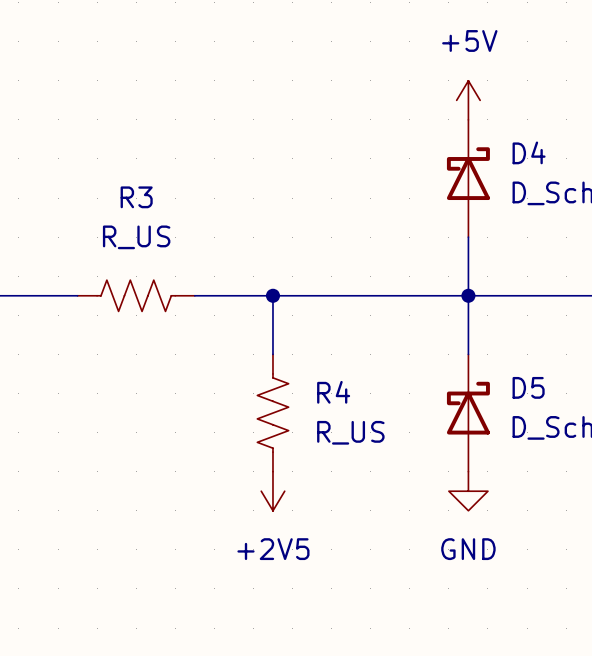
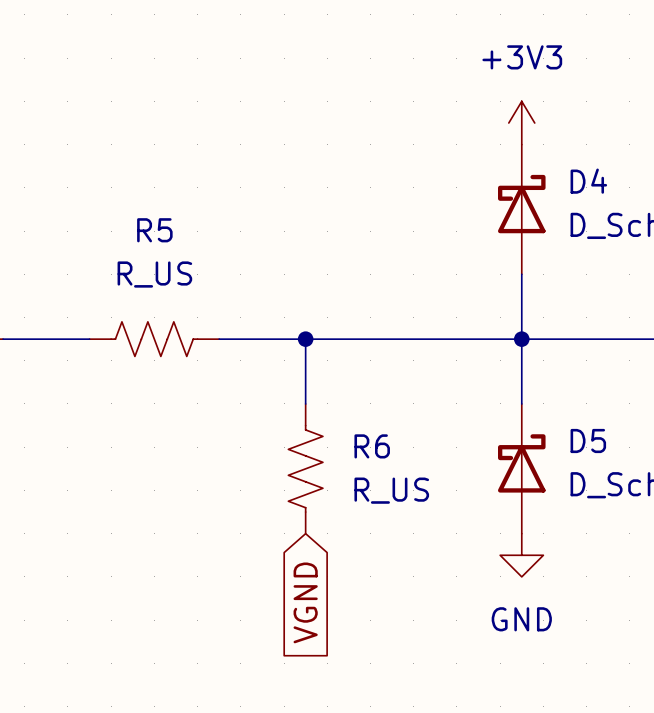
power symbol: +5V (468, 100) -> +3V3 (521, 123)
R3 name: R3 (136, 197) -> R5 (154, 230)
R4 name: R4 (333, 392) -> R6 (372, 446)
power symbol: +2V5 (272, 491) -> none
global label: none -> VGND (305, 602)

